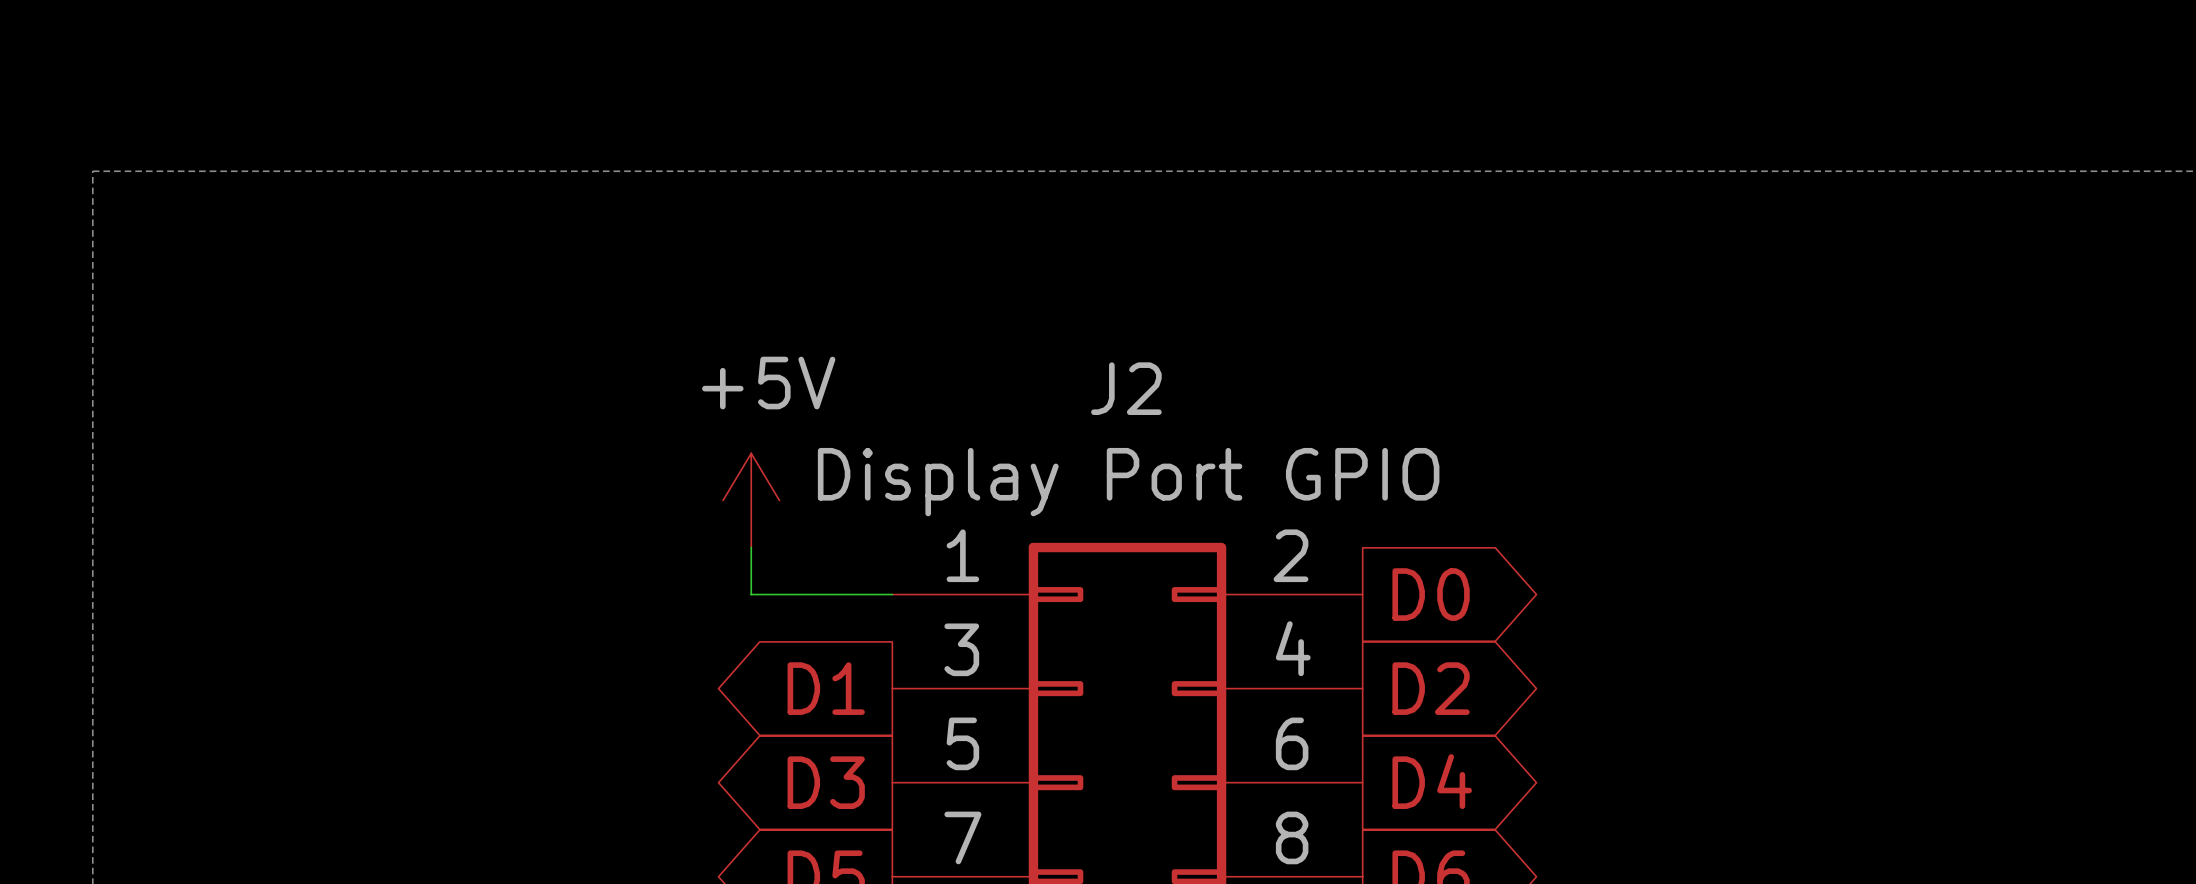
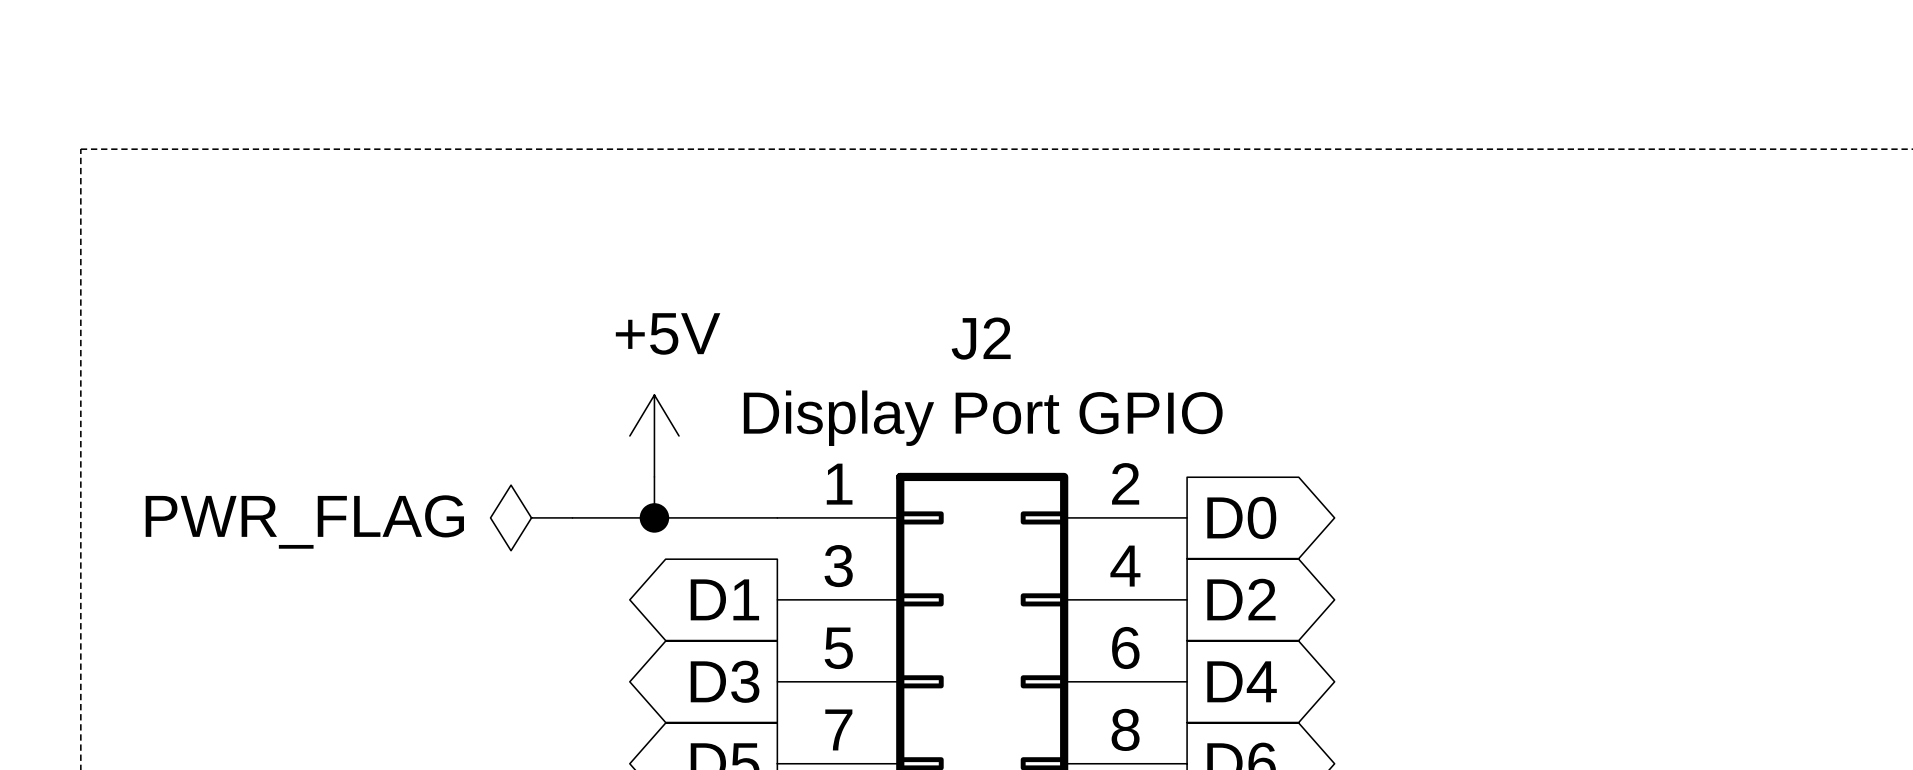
power symbol: none -> PWR_FLAG (531, 517)
wire: none -> (572, 517) (654, 517)
junction: none -> (654, 517)

